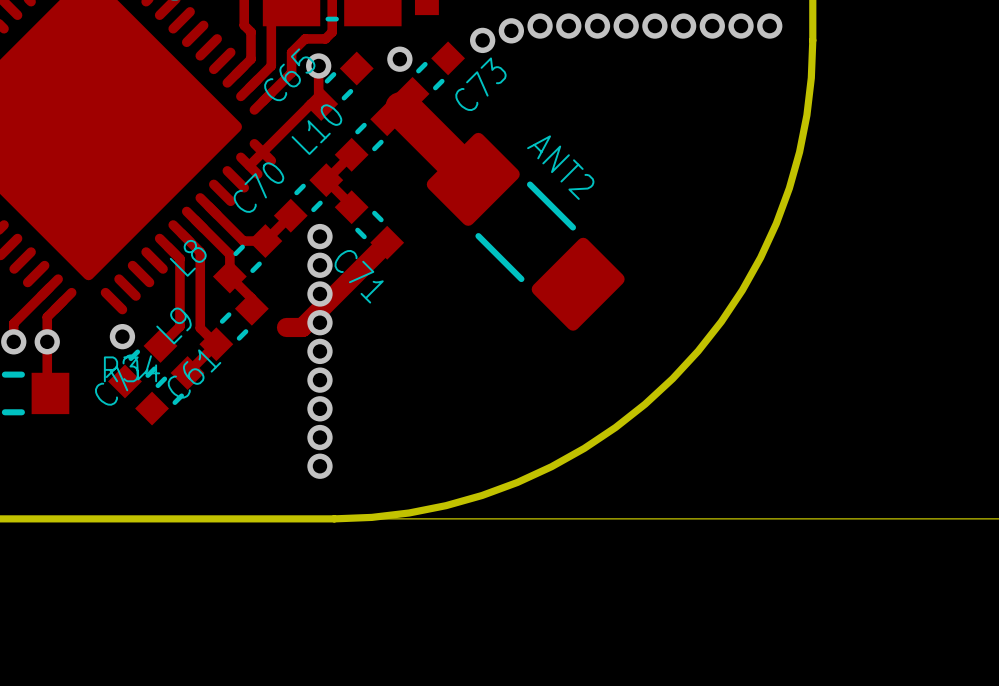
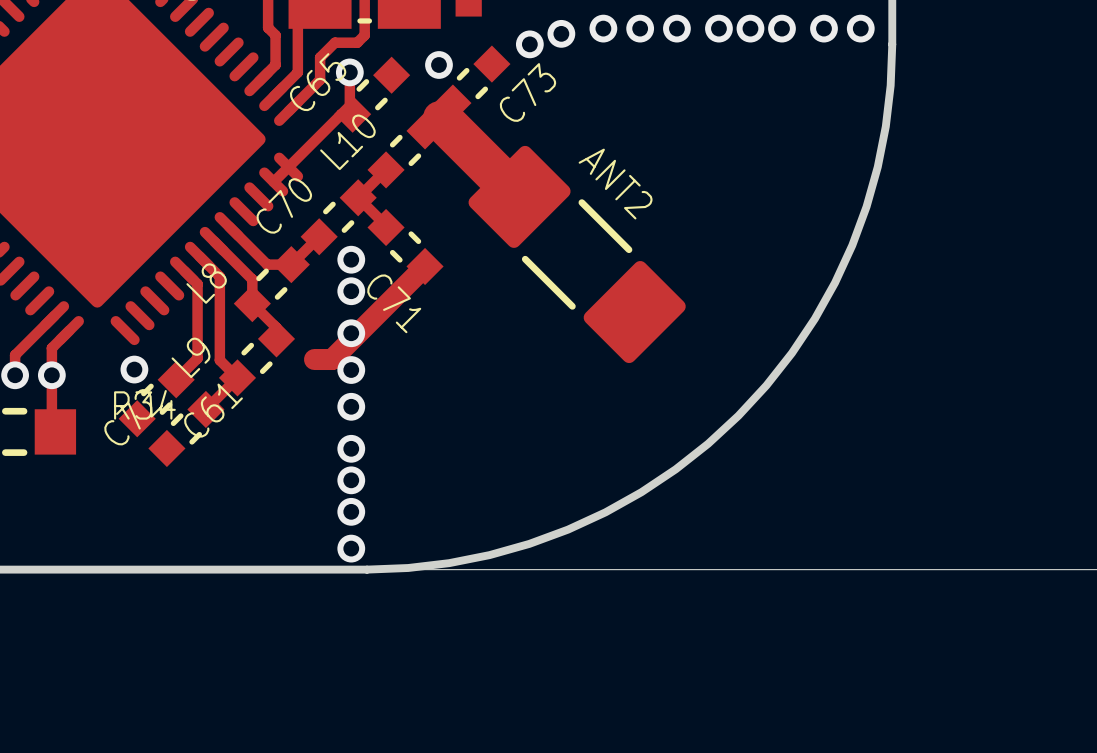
via: (540, 26) -> none
via: none -> (603, 28)
via: (568, 26) -> none
via: none -> (640, 28)
via: (597, 26) -> none
via: none -> (676, 28)
via: (626, 26) -> none
via: (741, 26) -> none
via: none -> (824, 28)
via: (769, 26) -> none
via: none -> (860, 28)
via: (319, 293) -> none
via: none -> (351, 333)
via: (319, 322) -> none
via: none -> (351, 370)
via: (319, 351) -> none
via: none -> (351, 406)
via: (319, 380) -> none
via: none -> (351, 548)

